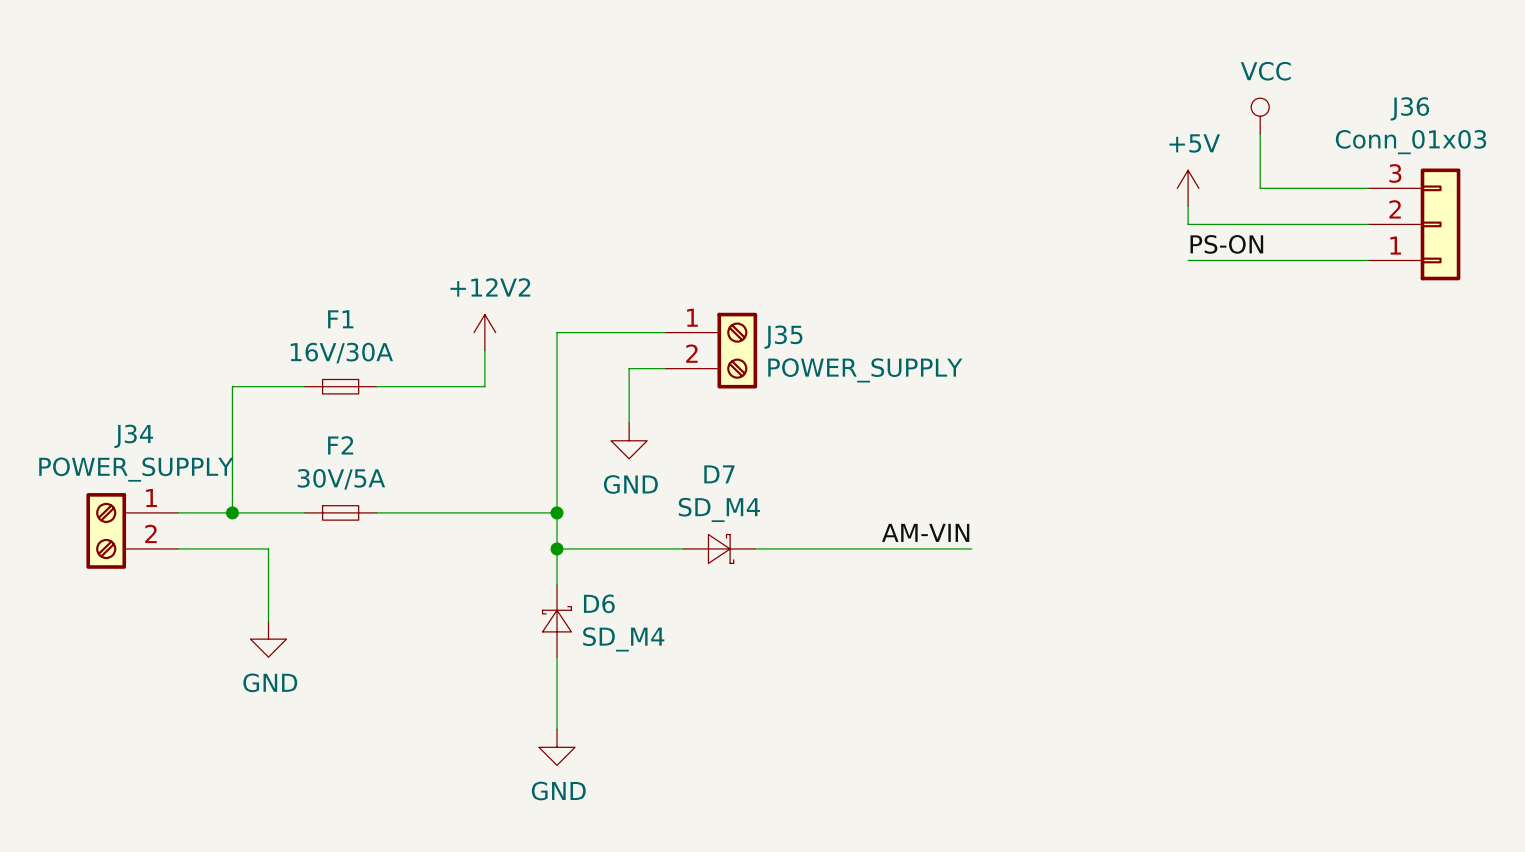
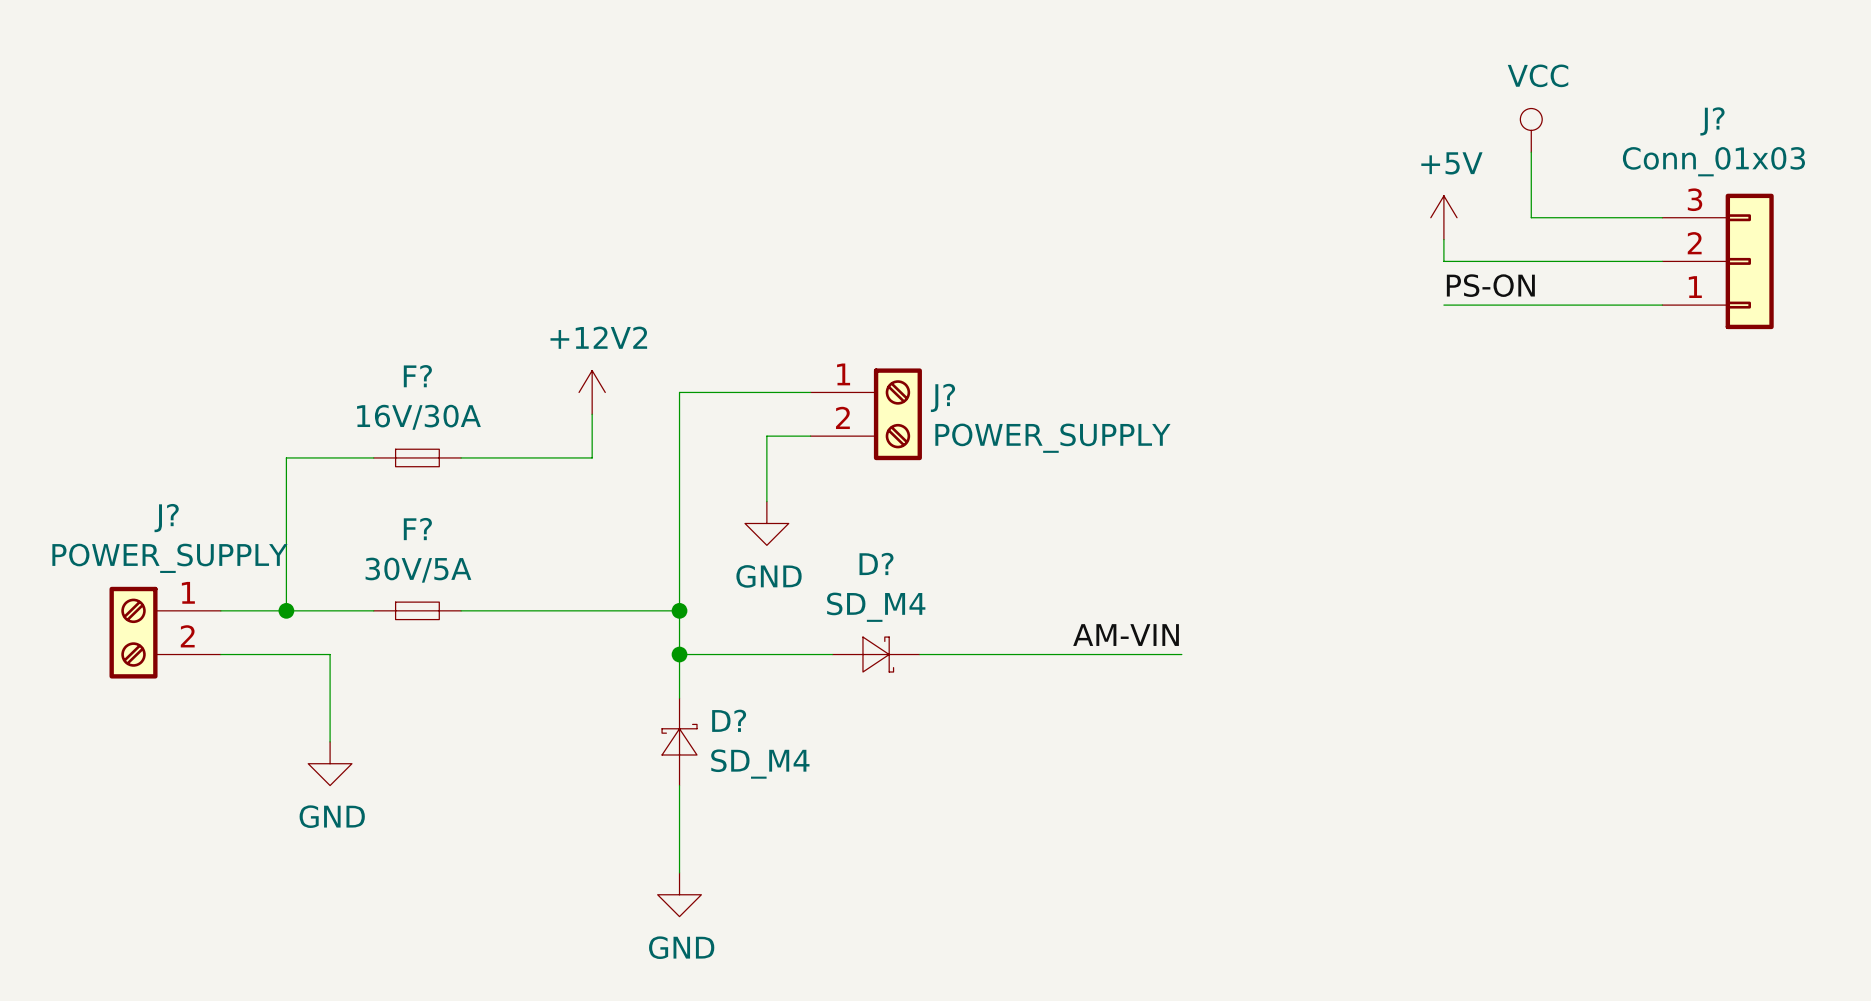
J36 name: J36 (1409, 108) -> J? (1712, 121)
F1 name: F1 (340, 319) -> F? (417, 376)
J35 name: J35 (783, 337) -> J? (942, 397)
J34 name: J34 (133, 436) -> J? (166, 518)
F2 name: F2 (340, 445) -> F? (417, 529)
D7 name: D7 (719, 474) -> D? (876, 563)
D6 name: D6 (599, 603) -> D? (729, 720)

